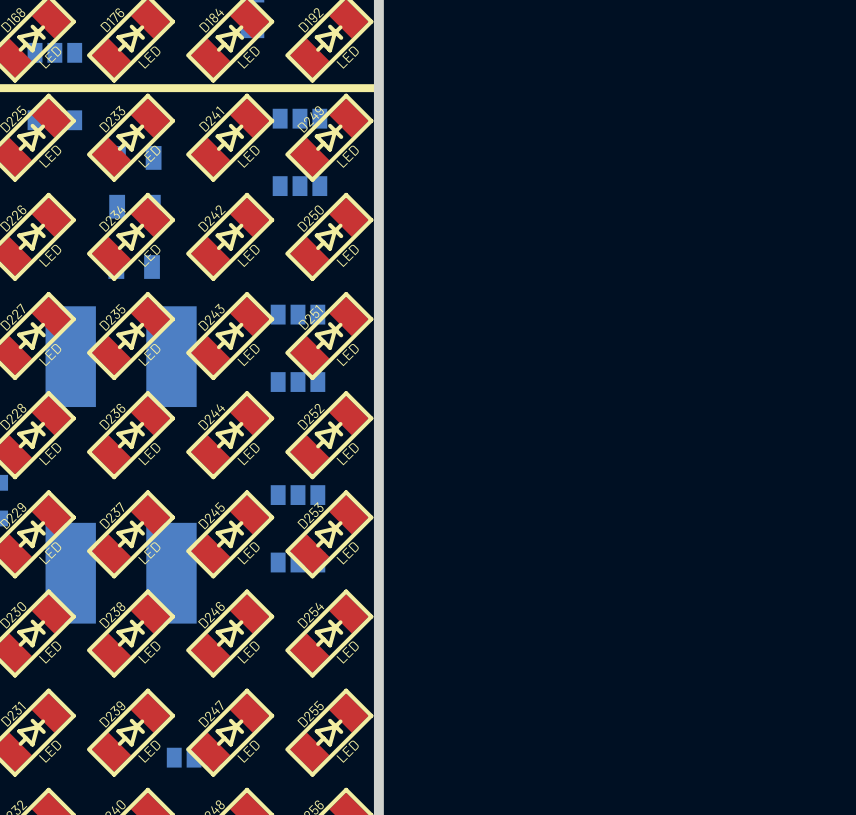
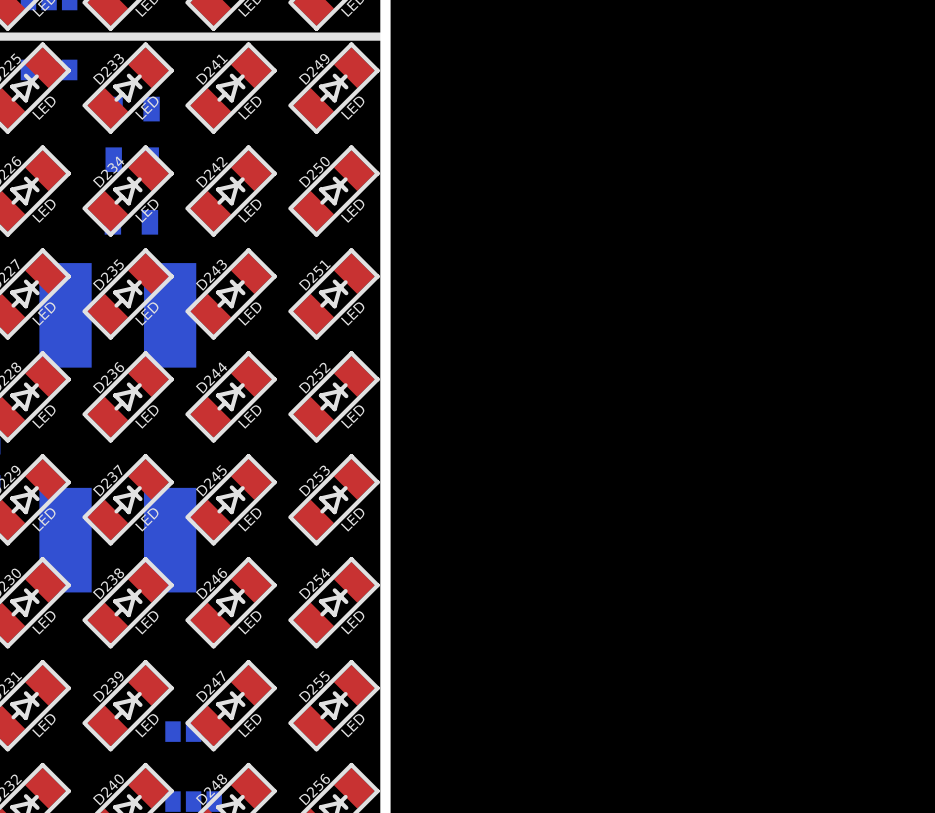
part: (299, 152) -> none
part: (298, 348) -> none
part: (298, 528) -> none

